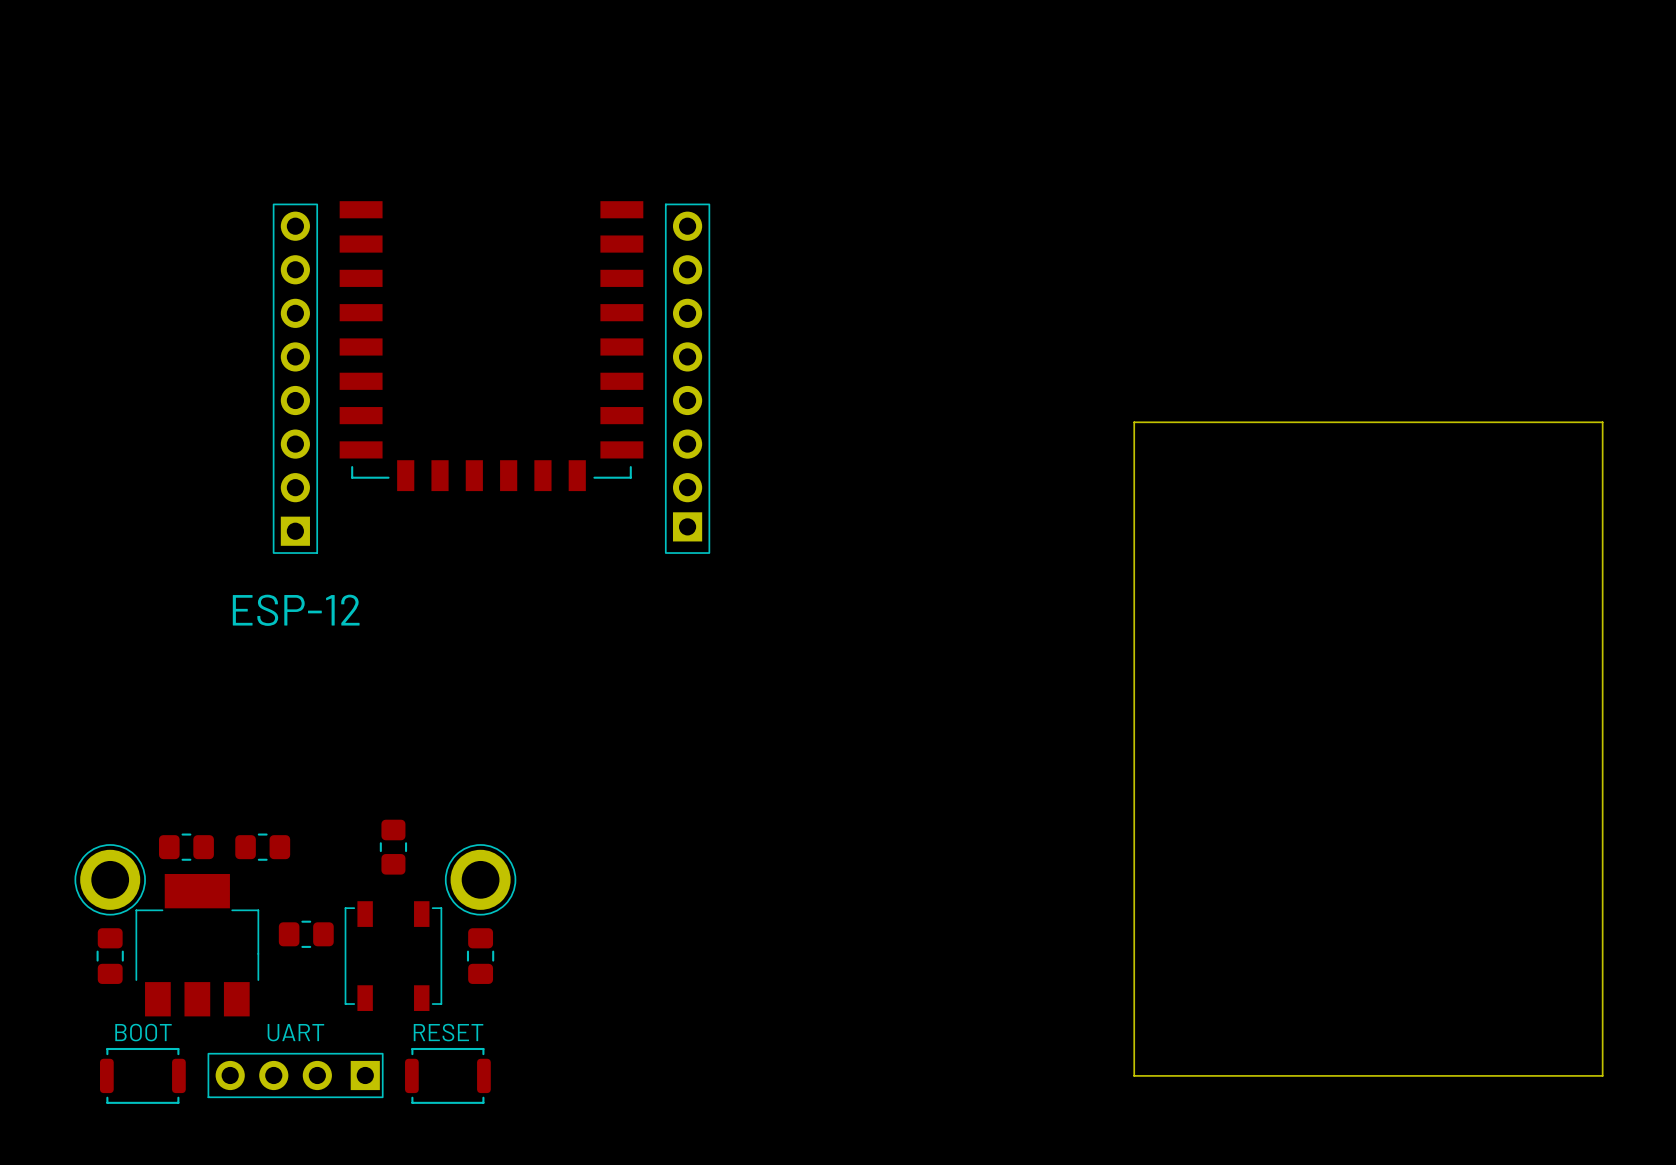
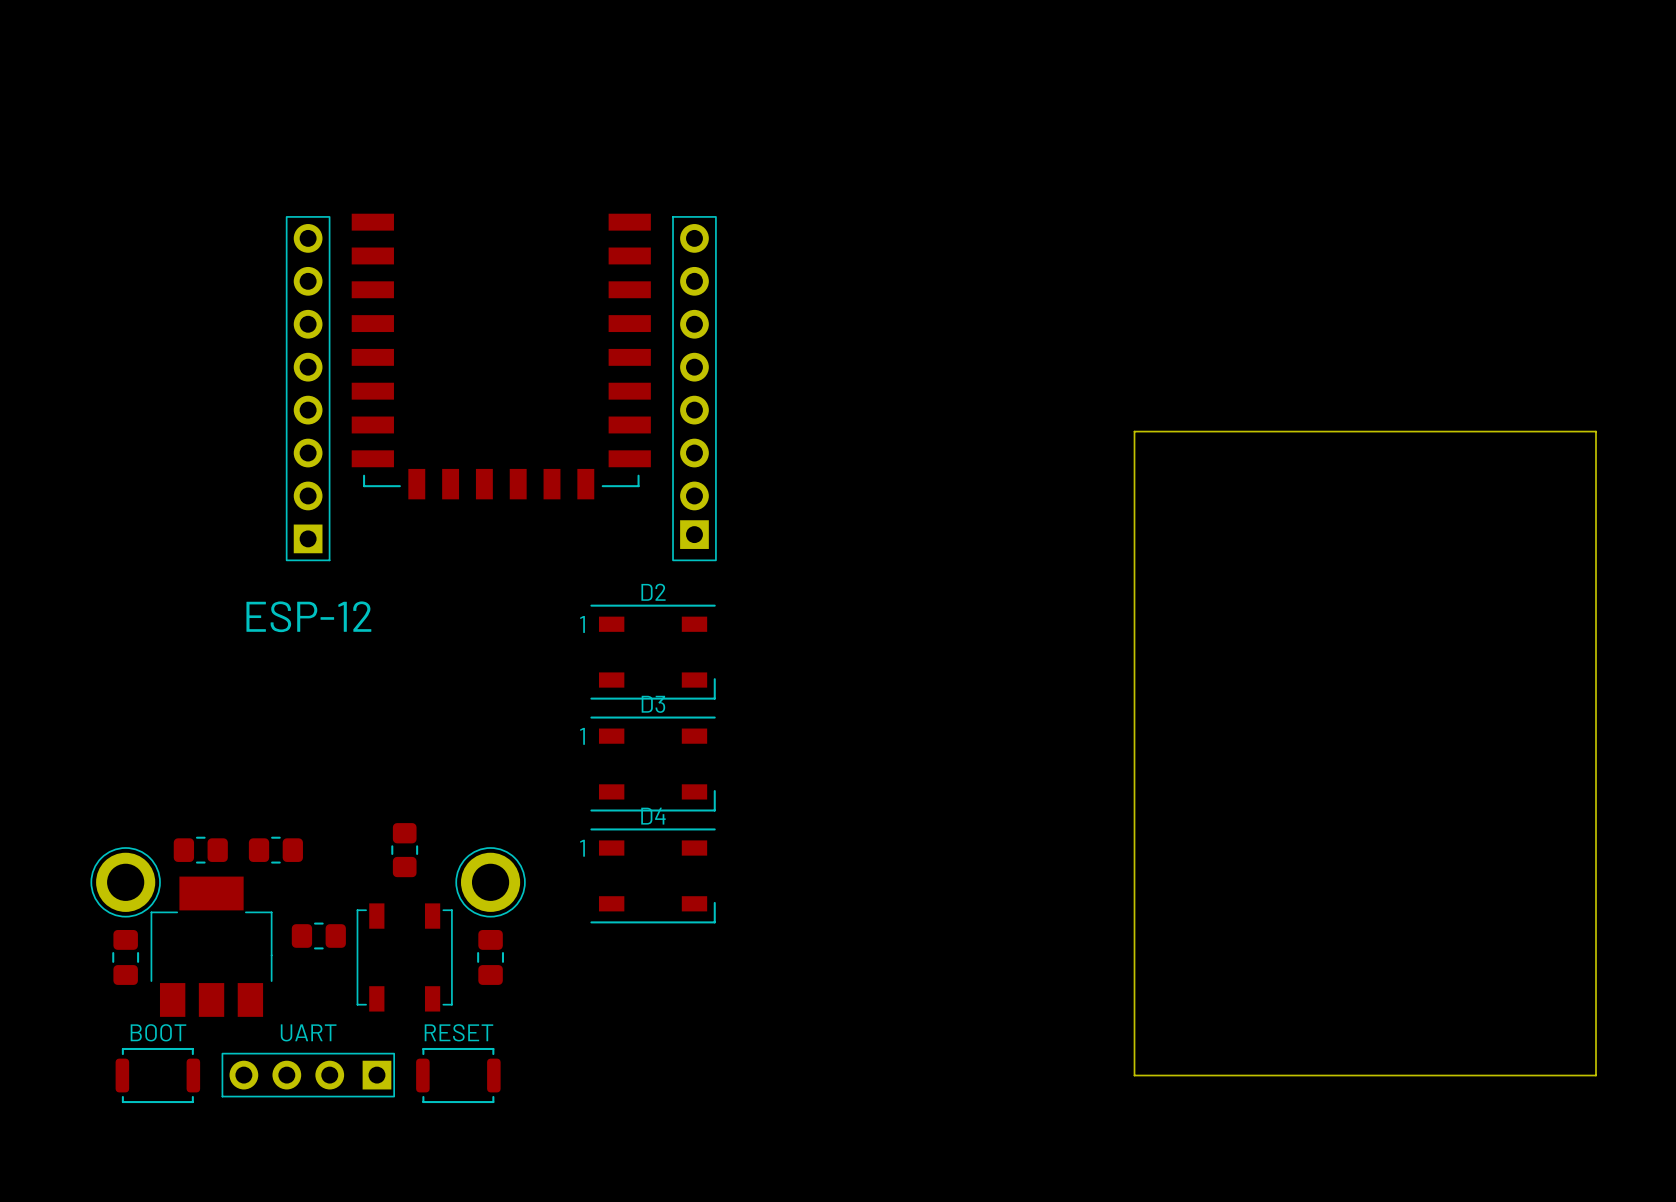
D2: none -> (653, 652)
D3: none -> (653, 764)
D4: none -> (653, 875)

